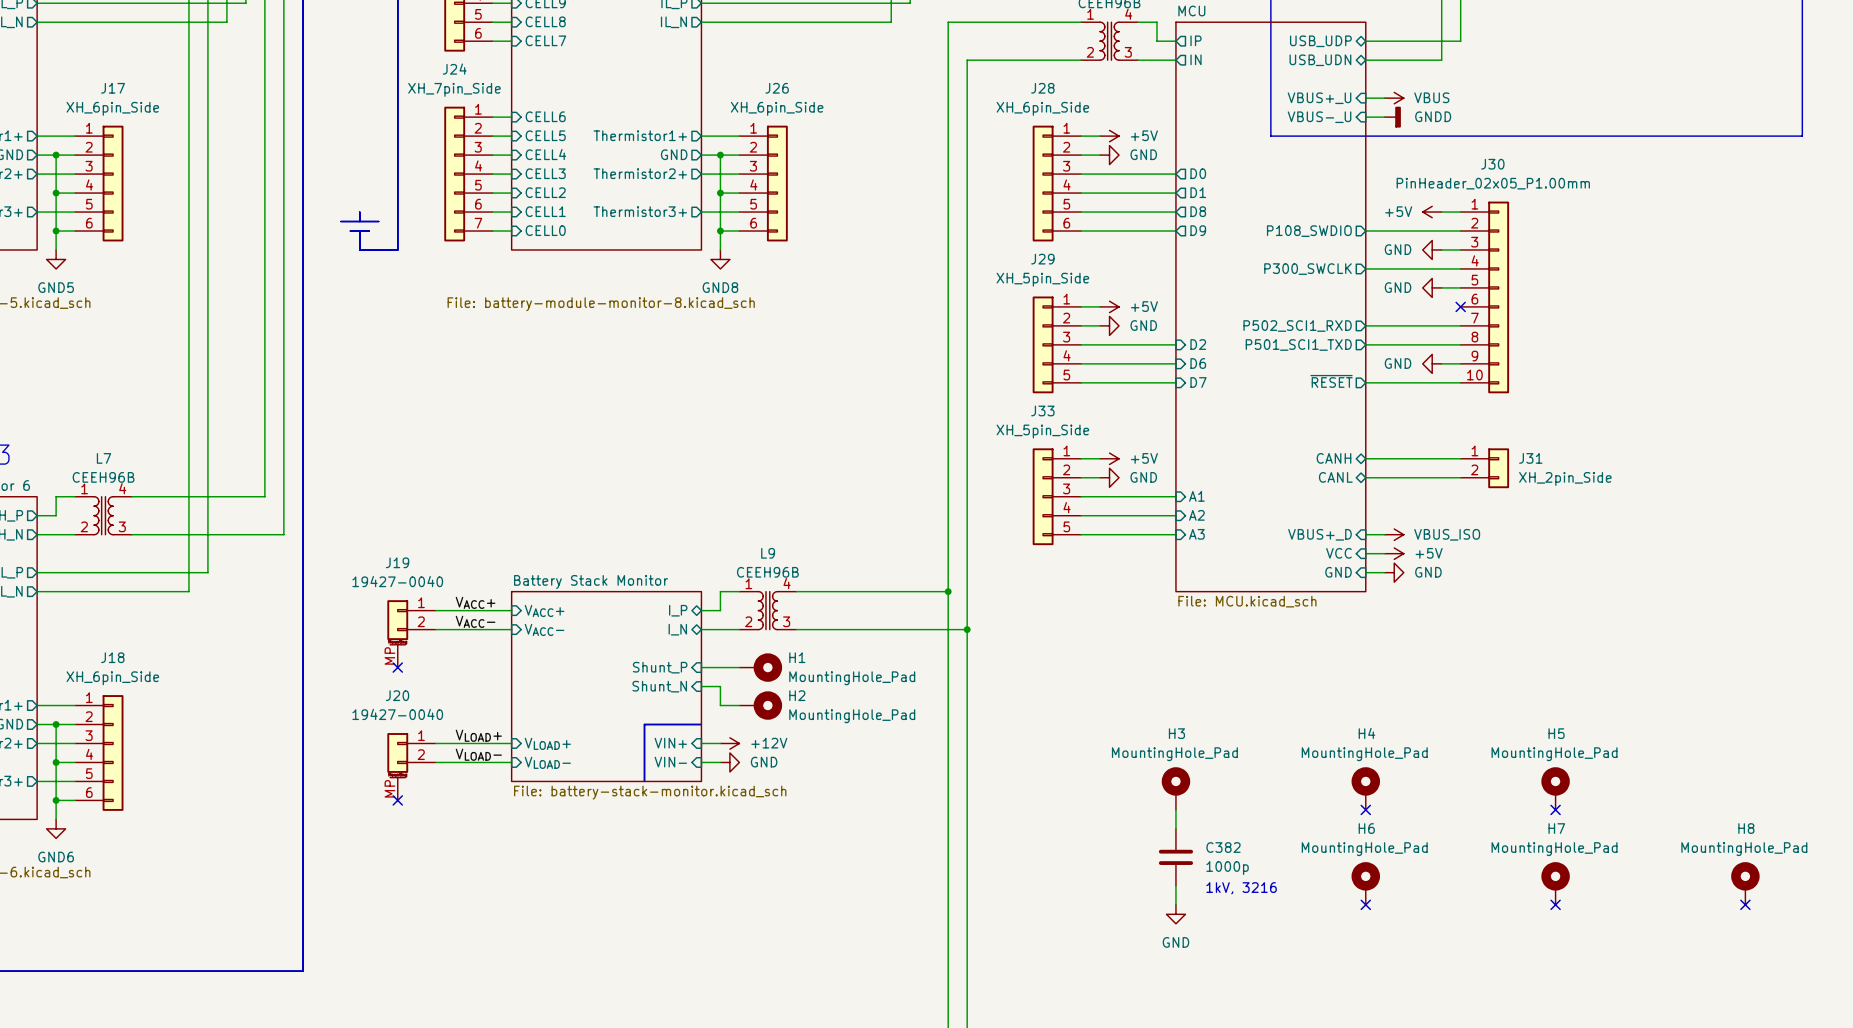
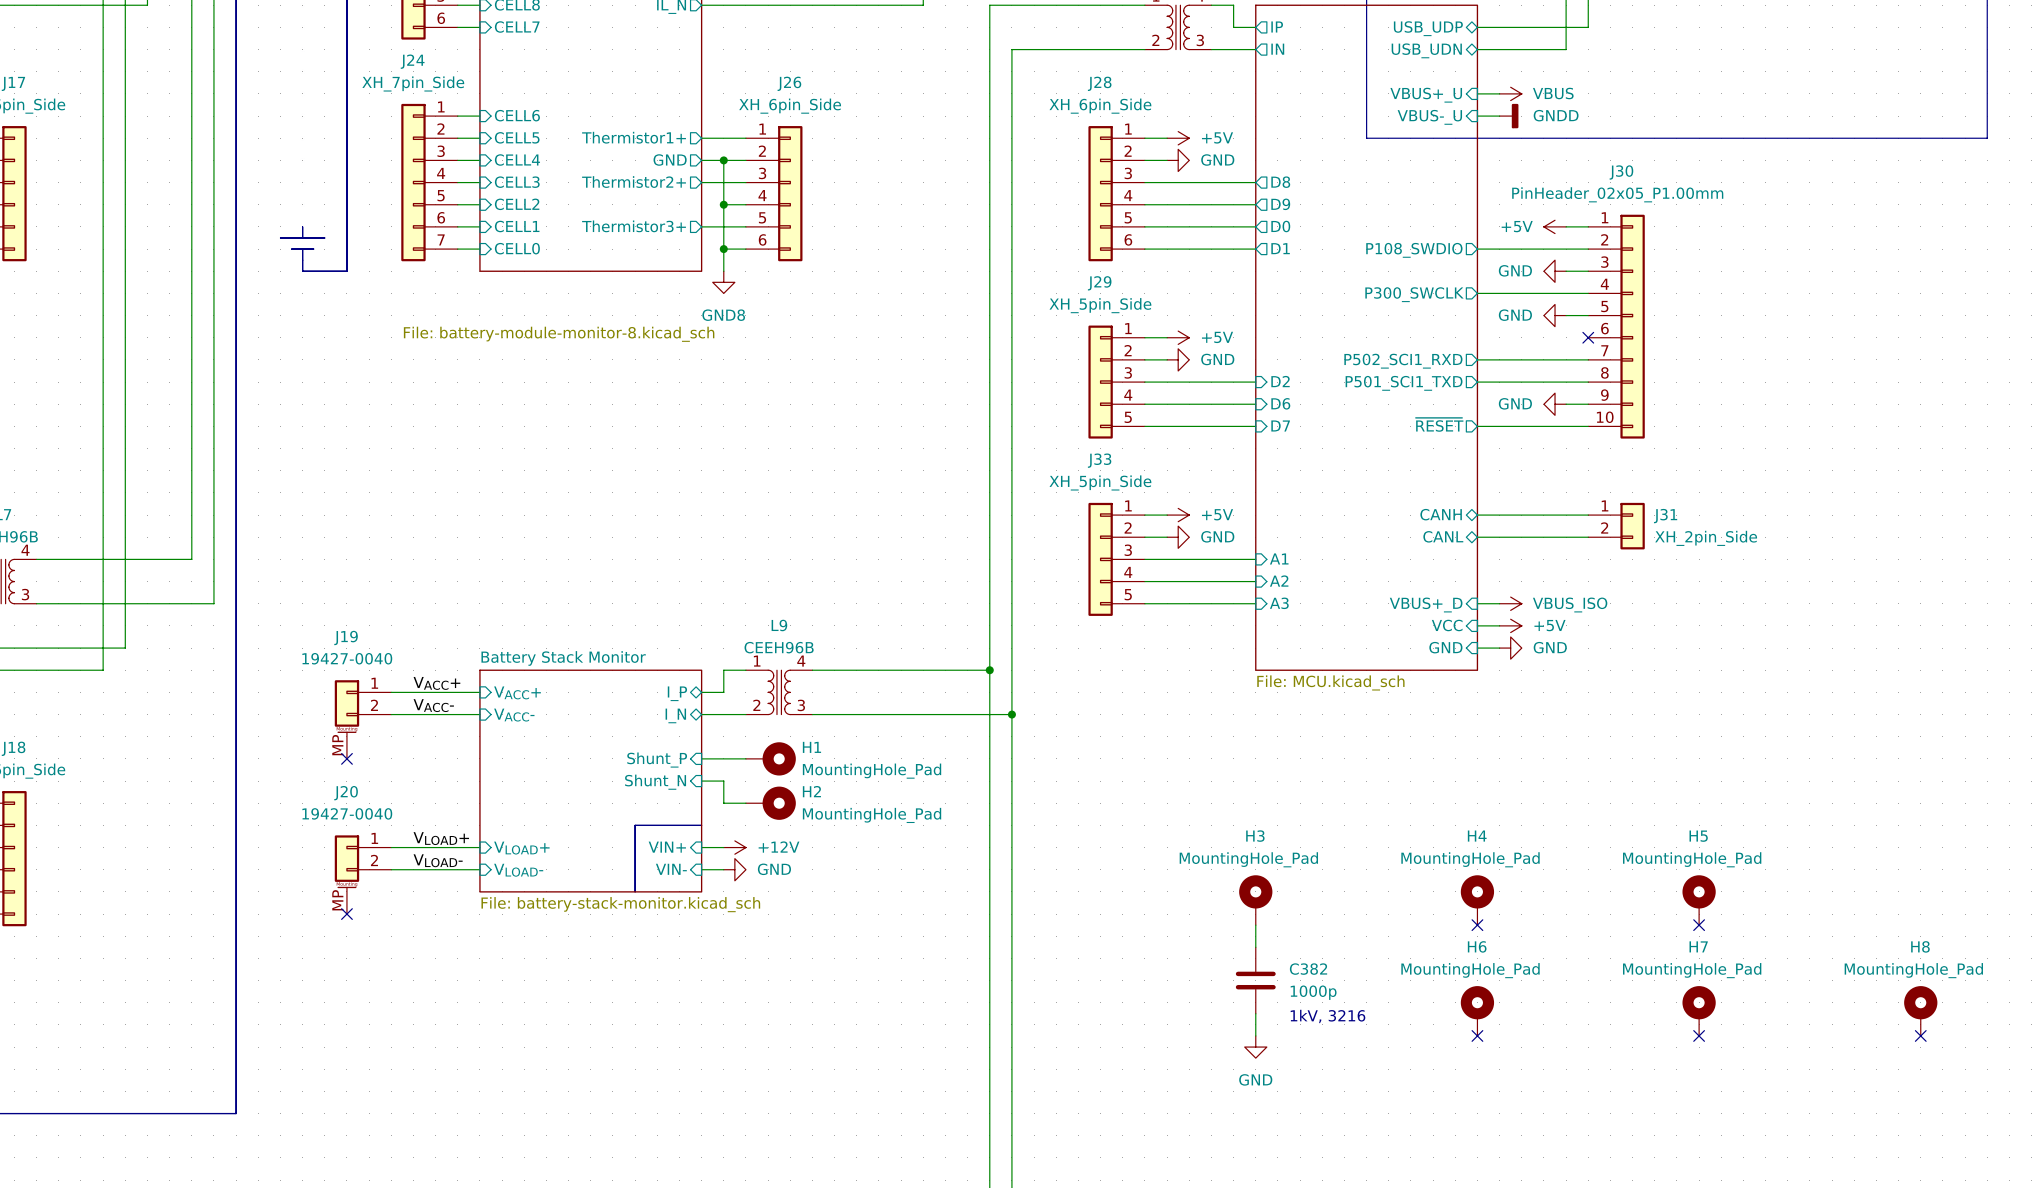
sheet pin: D0 (1198, 173) -> D8 (1280, 182)
sheet pin: D1 (1198, 192) -> D9 (1280, 204)
sheet pin: D8 (1198, 211) -> D0 (1280, 226)
sheet pin: D9 (1198, 230) -> D1 (1280, 248)

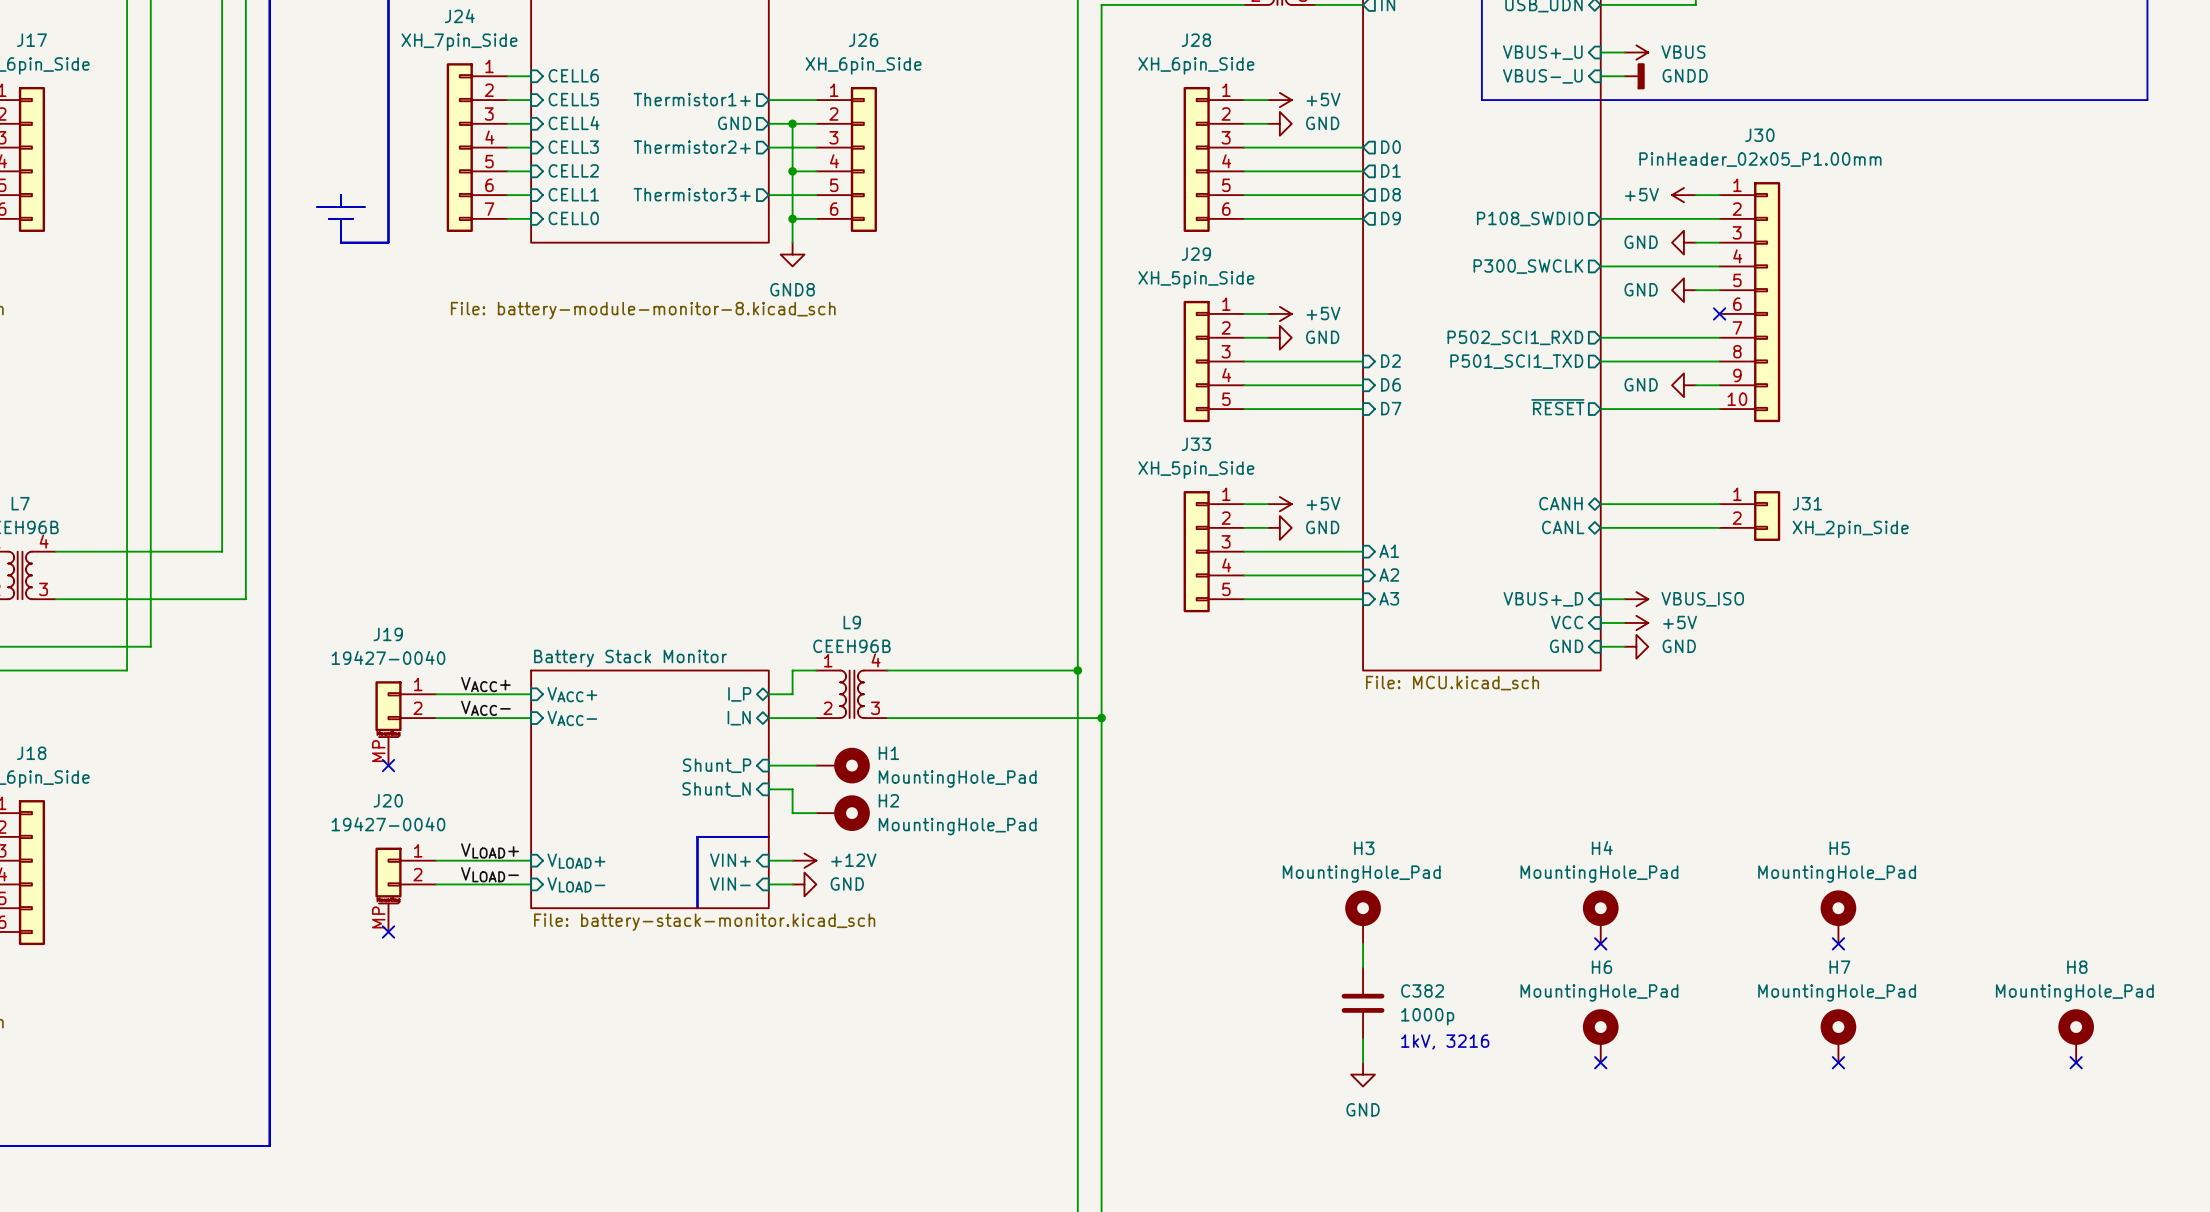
sheet pin: D8 (1280, 182) -> D0 (1390, 147)
sheet pin: D9 (1280, 204) -> D1 (1390, 170)
sheet pin: D0 (1280, 226) -> D8 (1390, 194)
sheet pin: D1 (1280, 248) -> D9 (1390, 218)

